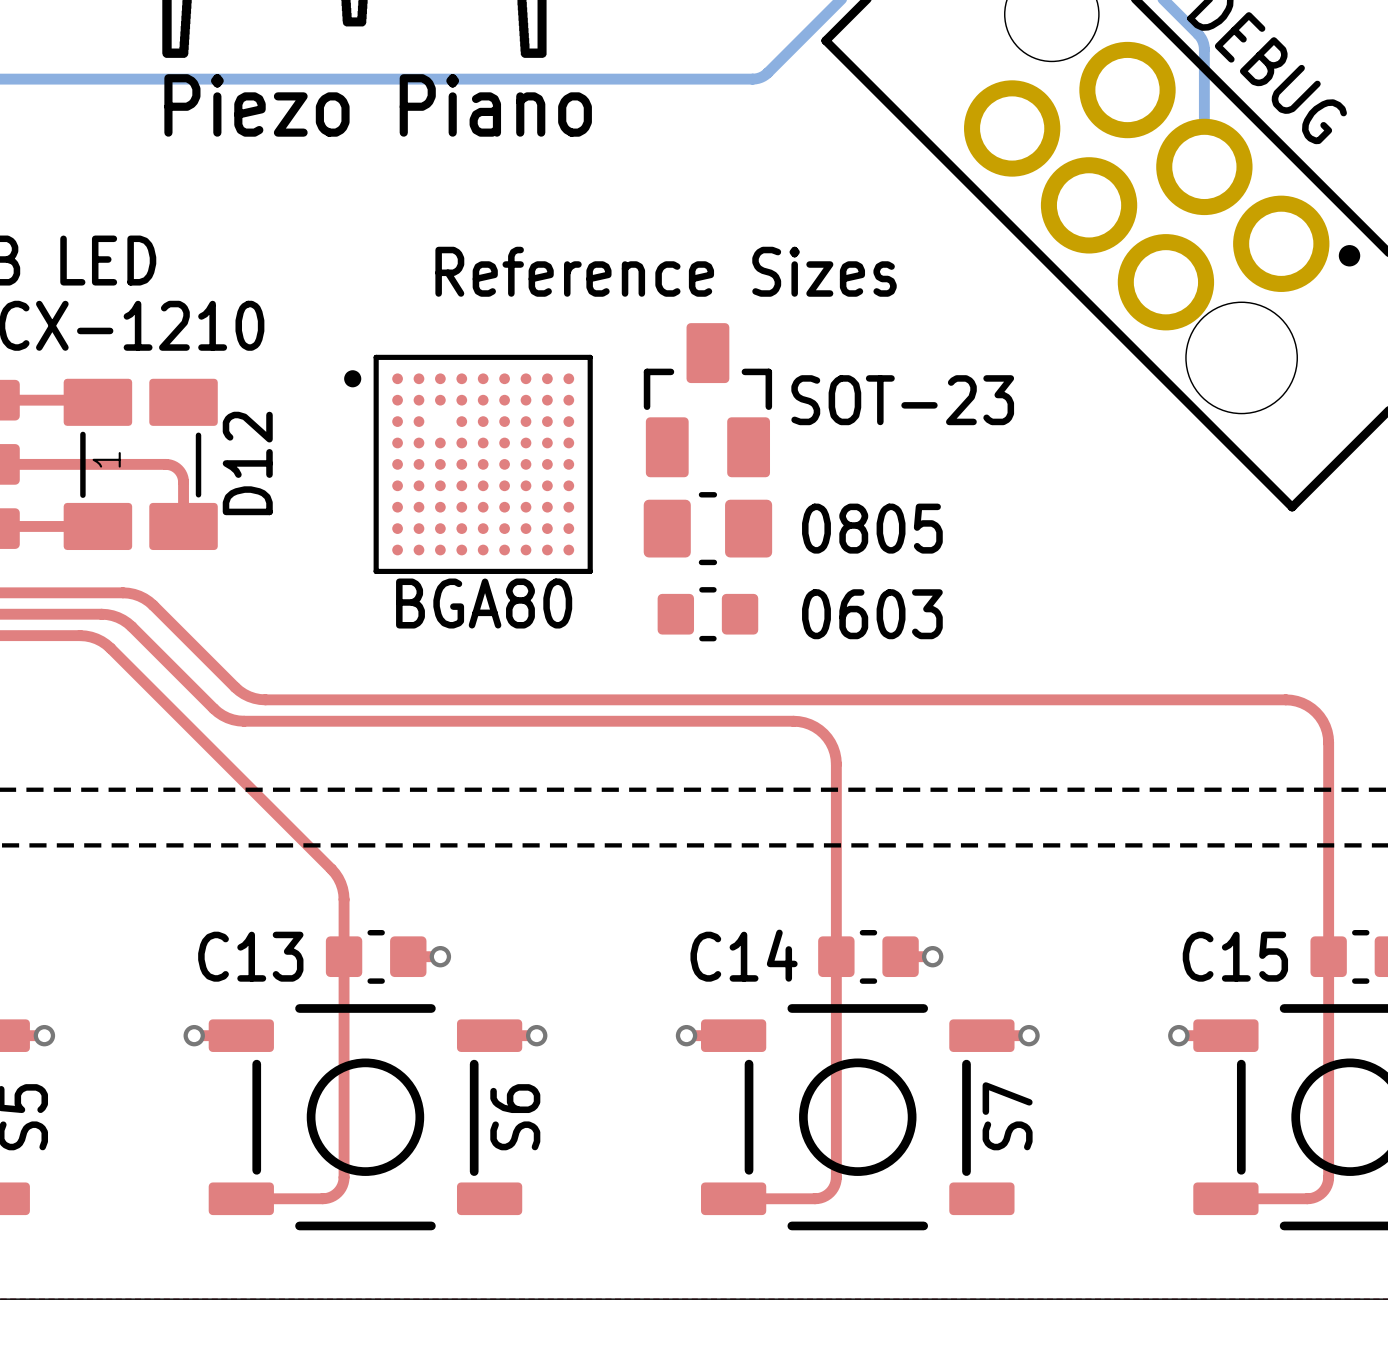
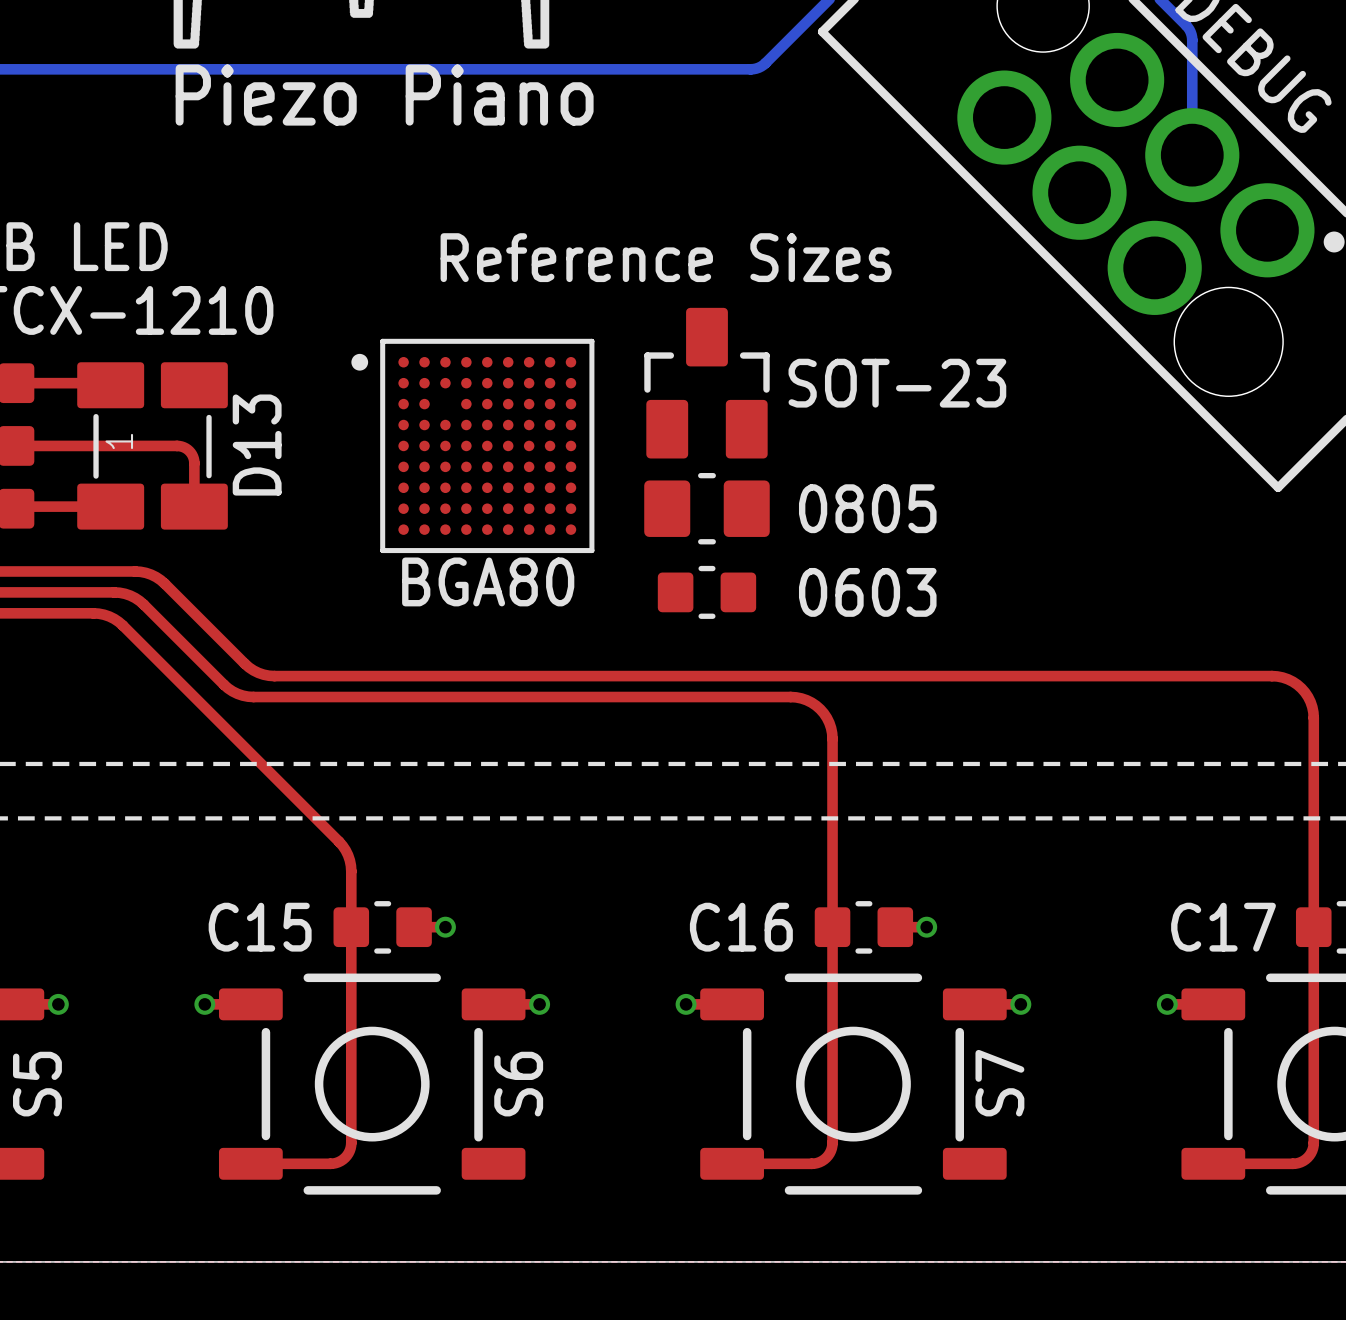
D12 name: D12 (247, 463) -> D13 (257, 445)
C14 name: C14 (744, 955) -> C16 (741, 927)
C13 name: C13 (250, 956) -> C15 (260, 927)
C15 name: C15 (1235, 956) -> C17 (1223, 927)

